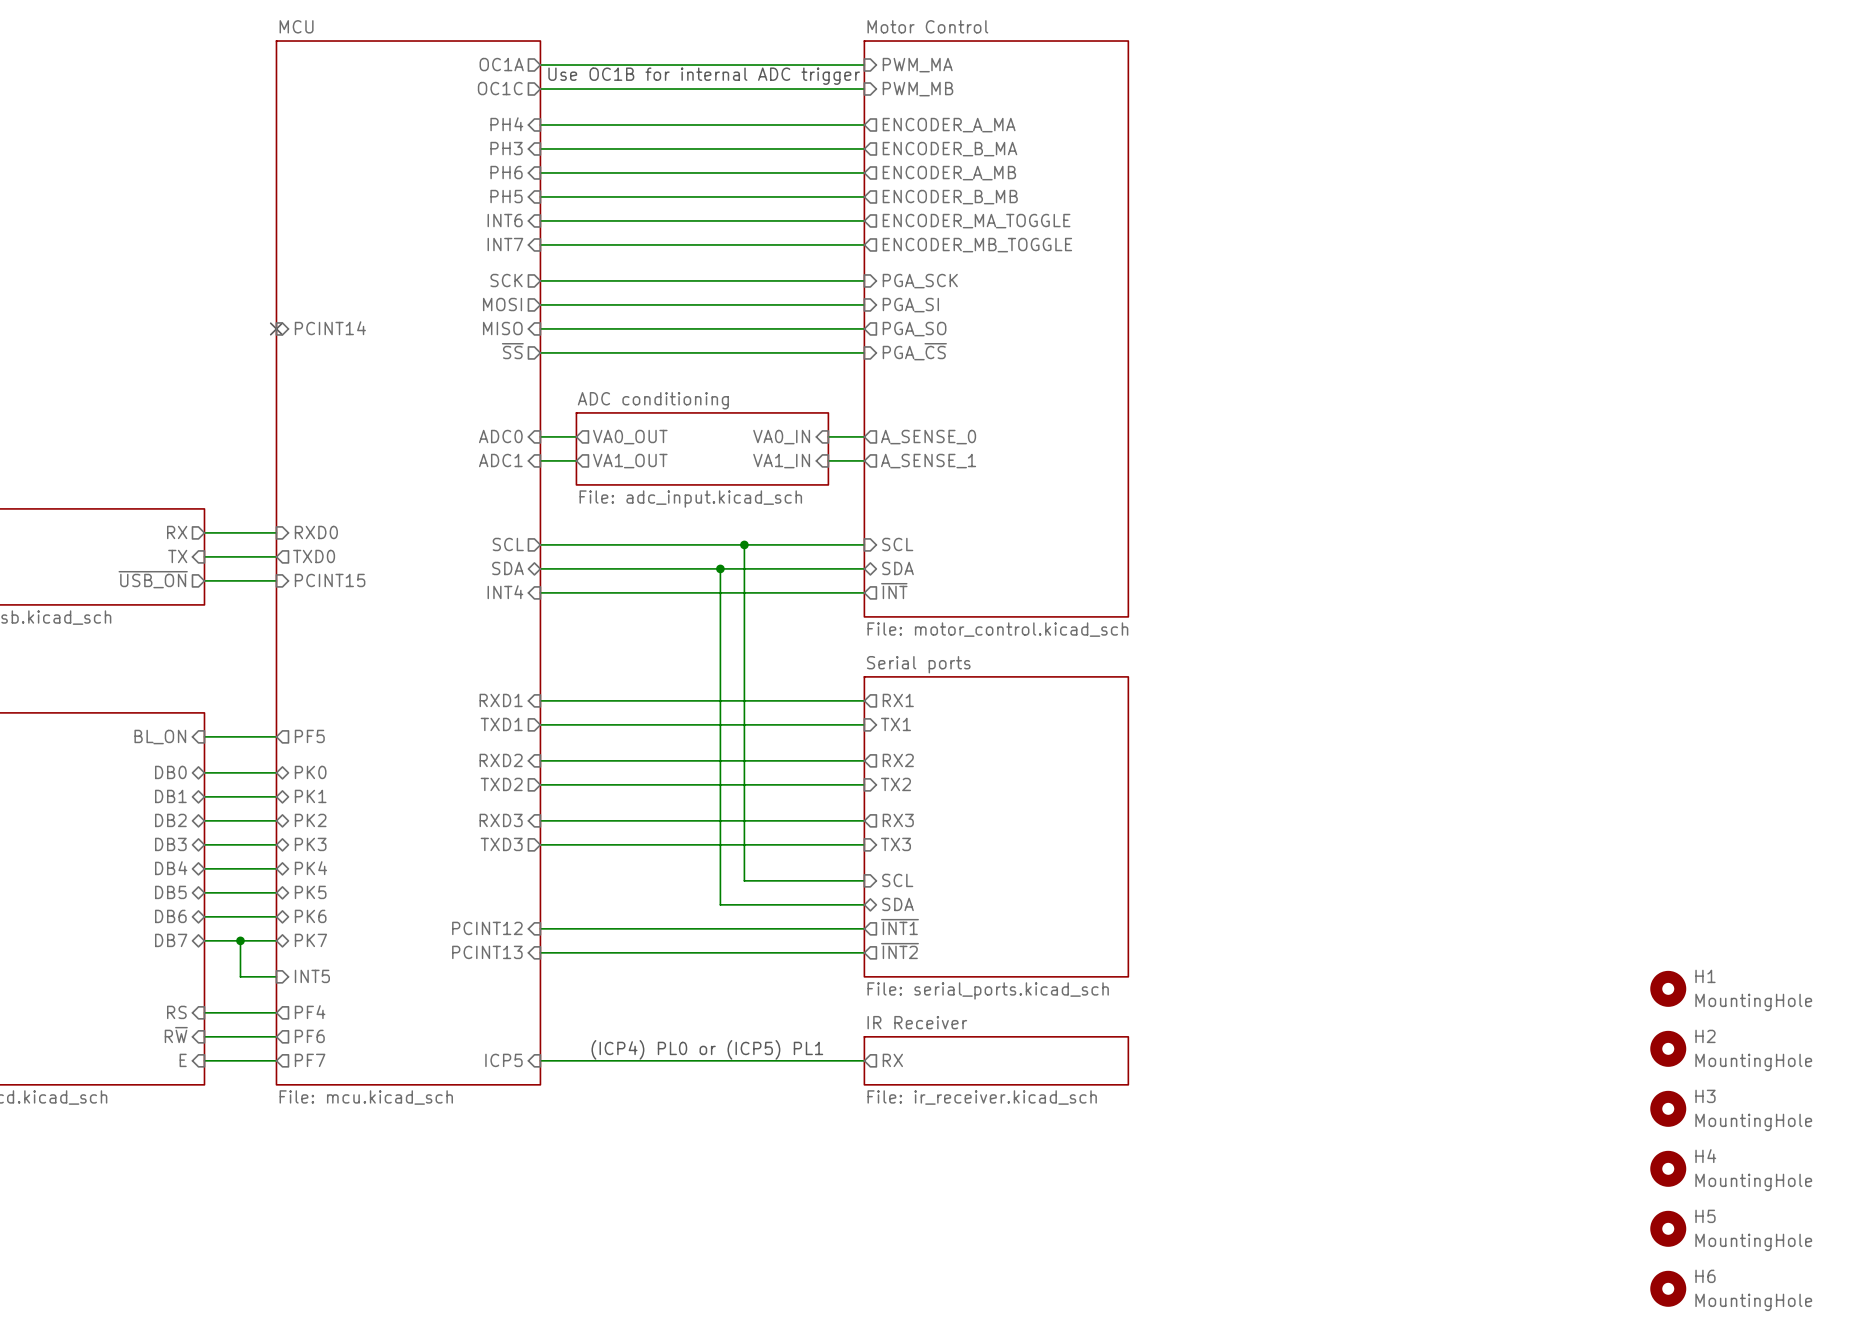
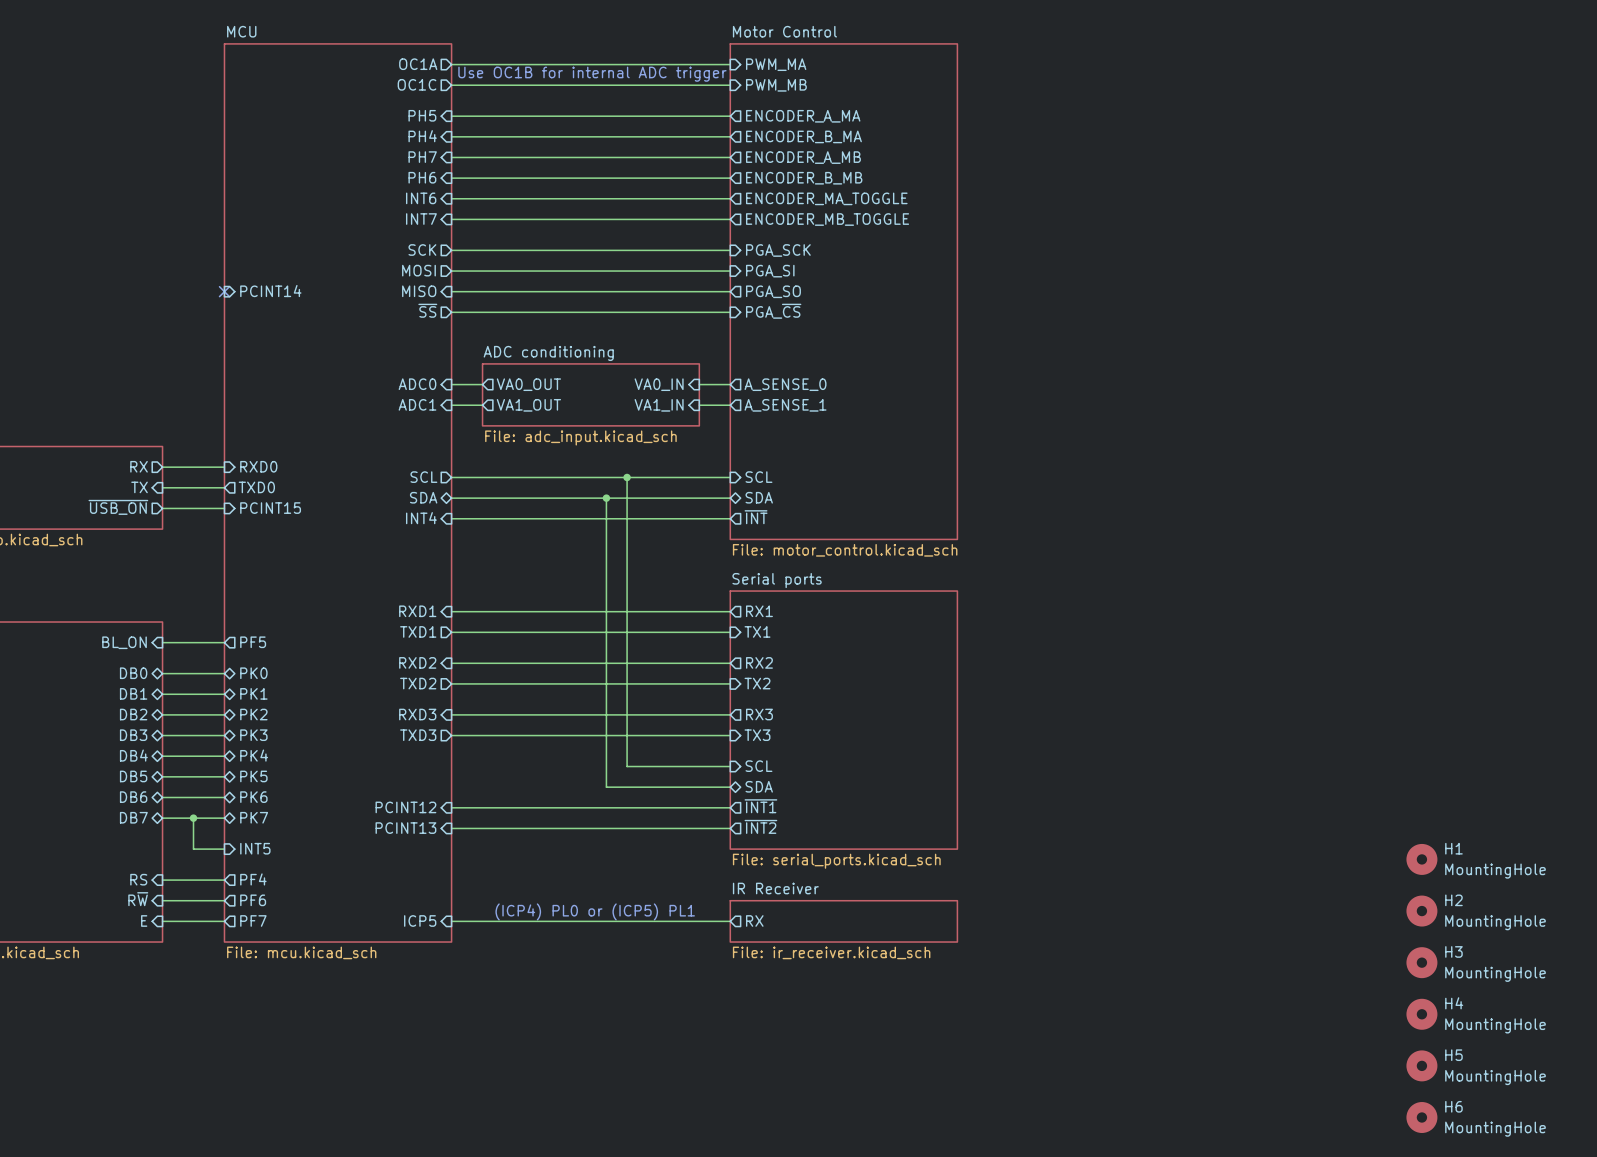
sheet pin: PH4 (506, 124) -> PH5 (422, 115)
sheet pin: PH3 (506, 148) -> PH4 (422, 136)
sheet pin: PH6 (506, 172) -> PH7 (422, 157)
sheet pin: PH5 (506, 196) -> PH6 (422, 177)

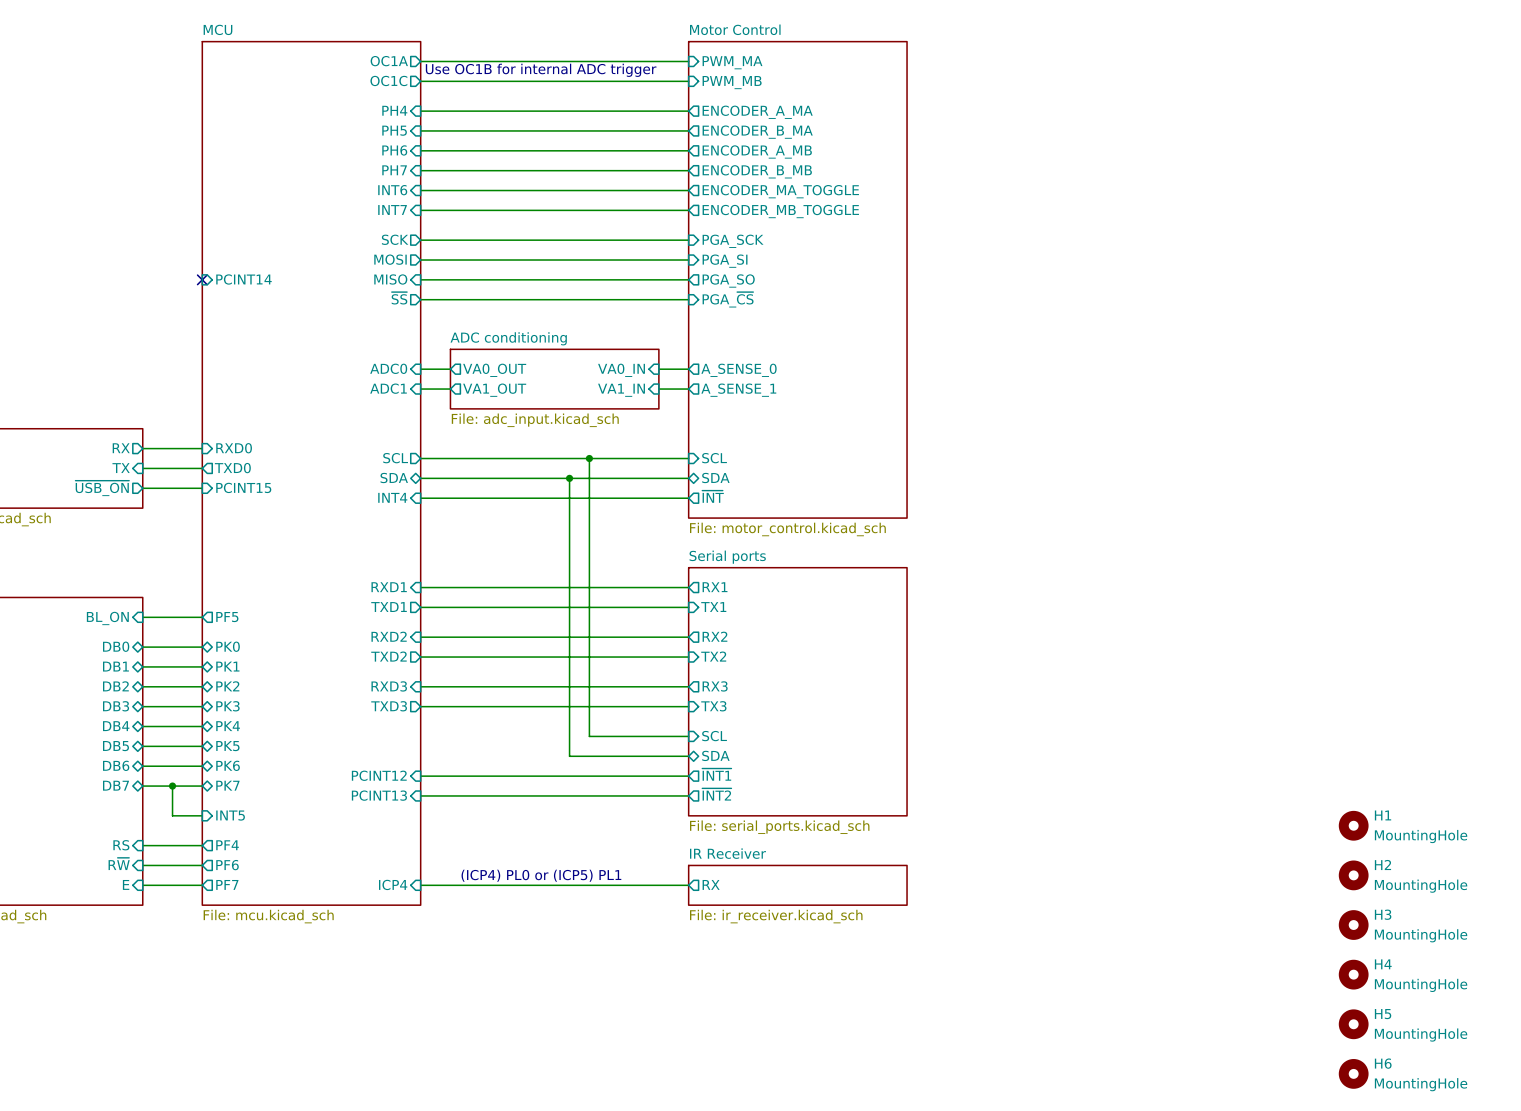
sheet pin: PH5 (422, 115) -> PH4 (394, 110)
sheet pin: PH4 (422, 136) -> PH5 (394, 130)
sheet pin: PH7 (422, 157) -> PH6 (394, 150)
sheet pin: PH6 (422, 177) -> PH7 (394, 170)
sheet pin: ICP5 (420, 920) -> ICP4 (393, 884)

